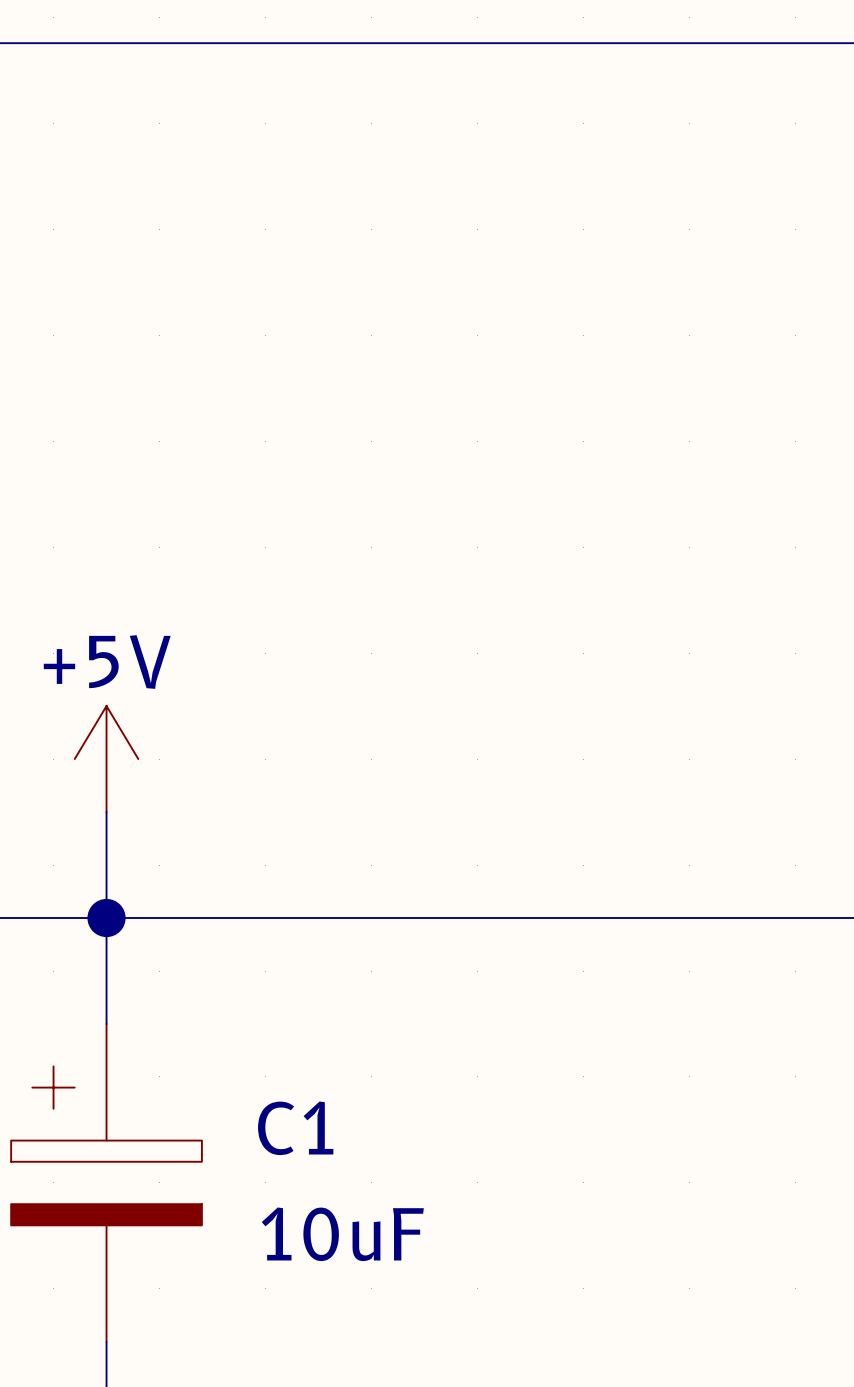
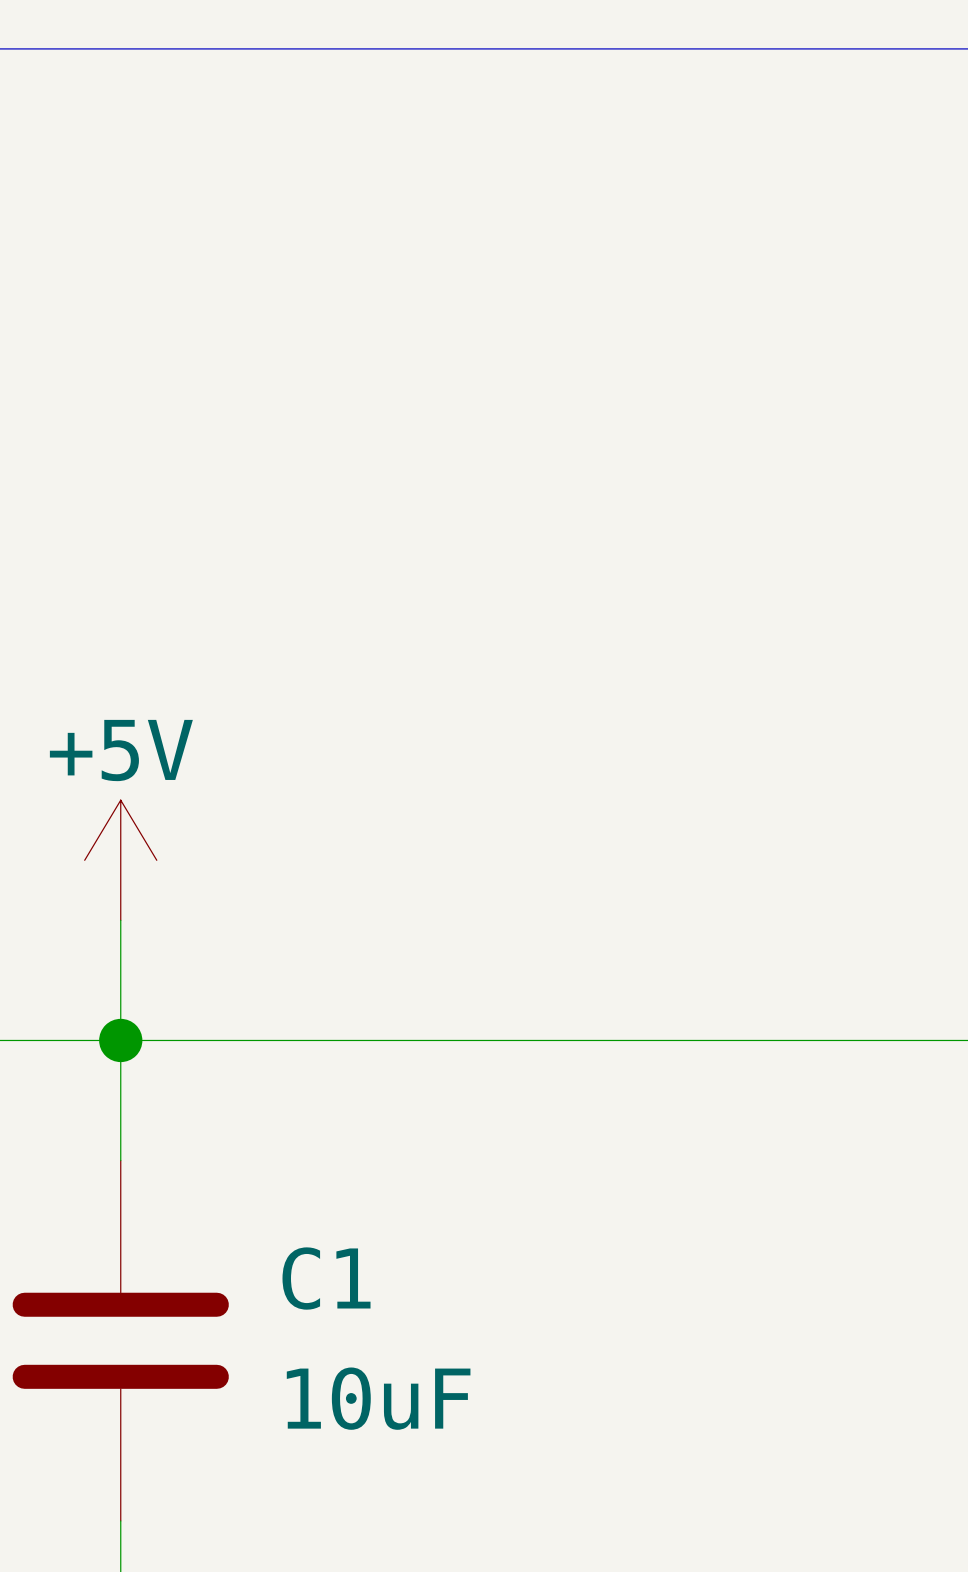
C1 symbol: [11, 1023, 202, 1342] -> [12, 1160, 229, 1521]

